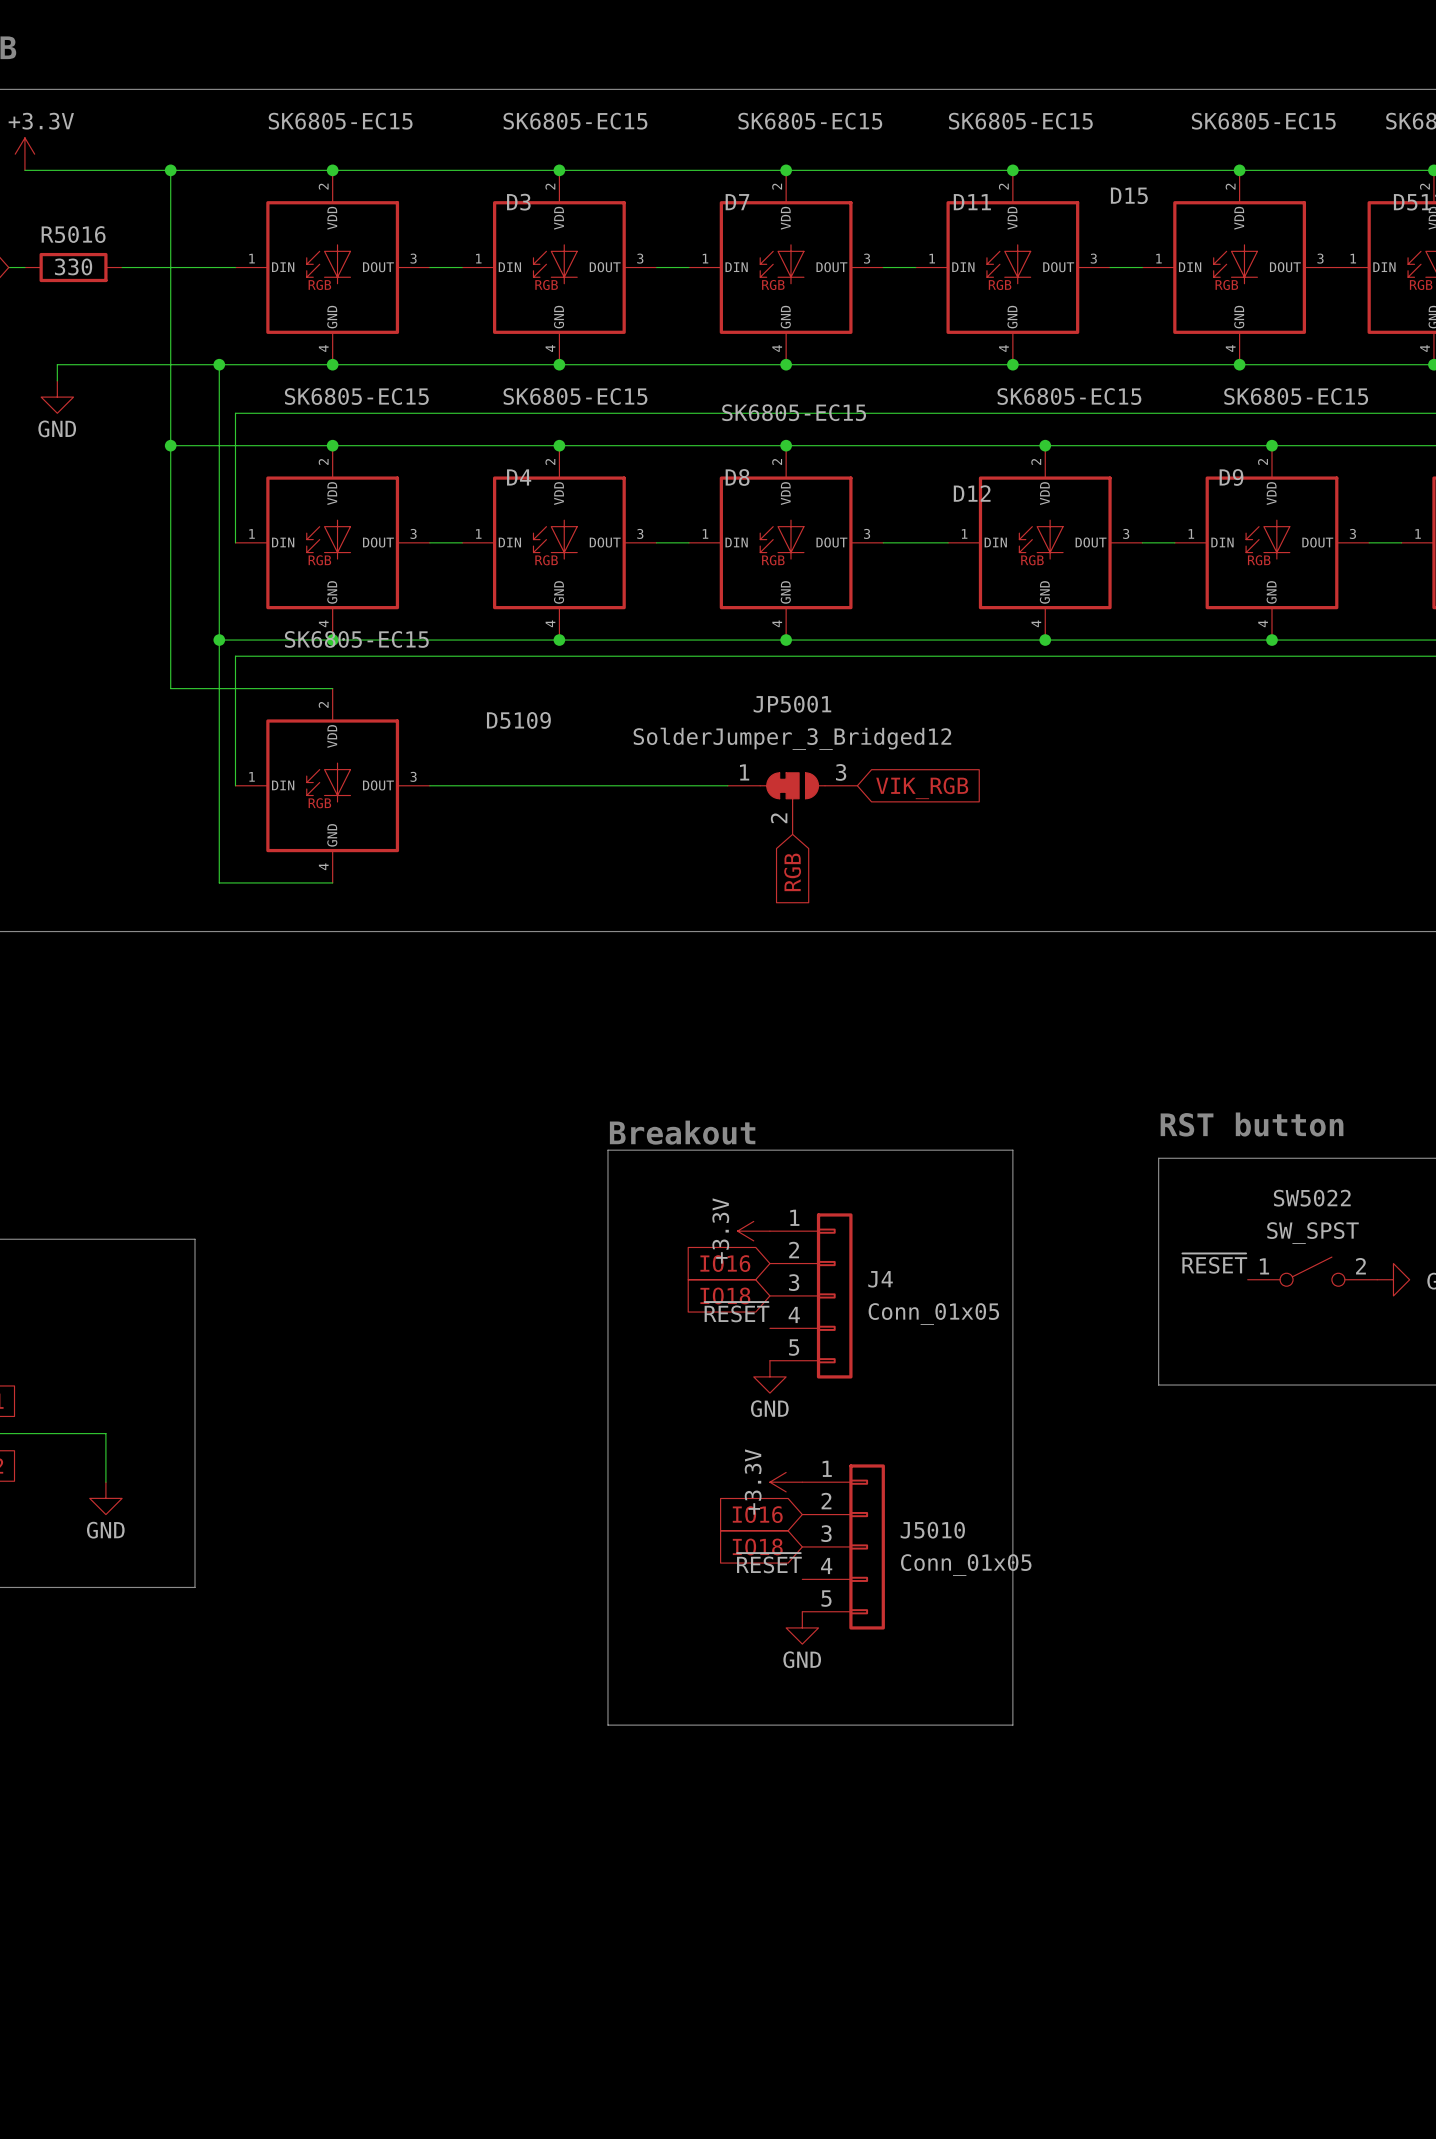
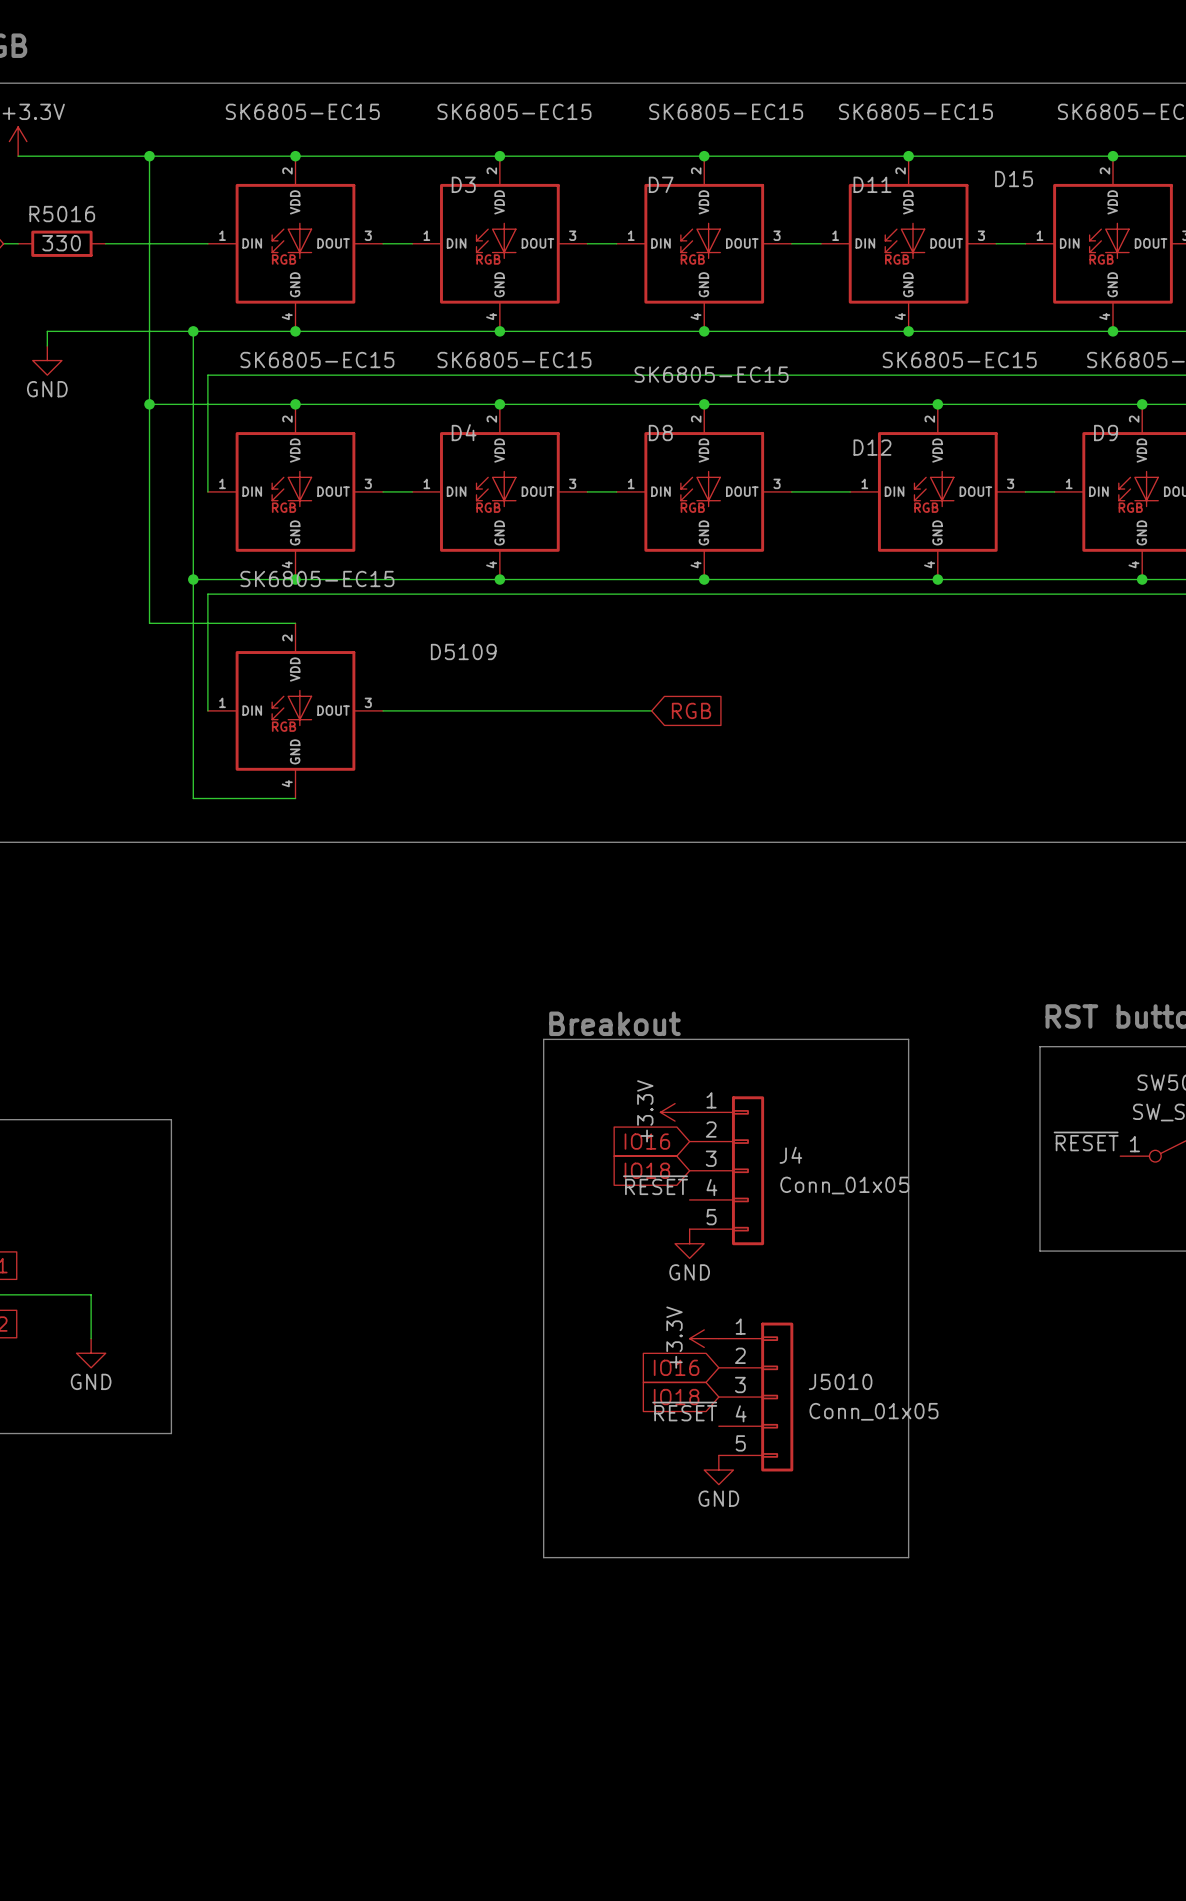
global label: VIK_RGB (922, 788) -> none
JP5001: SolderJumper_3_Bridged12 (792, 803) -> none
global label rotation: 0° (792, 872) -> 90° counterclockwise (691, 710)
global label position: RGB (792, 872) -> RGB (691, 710)

